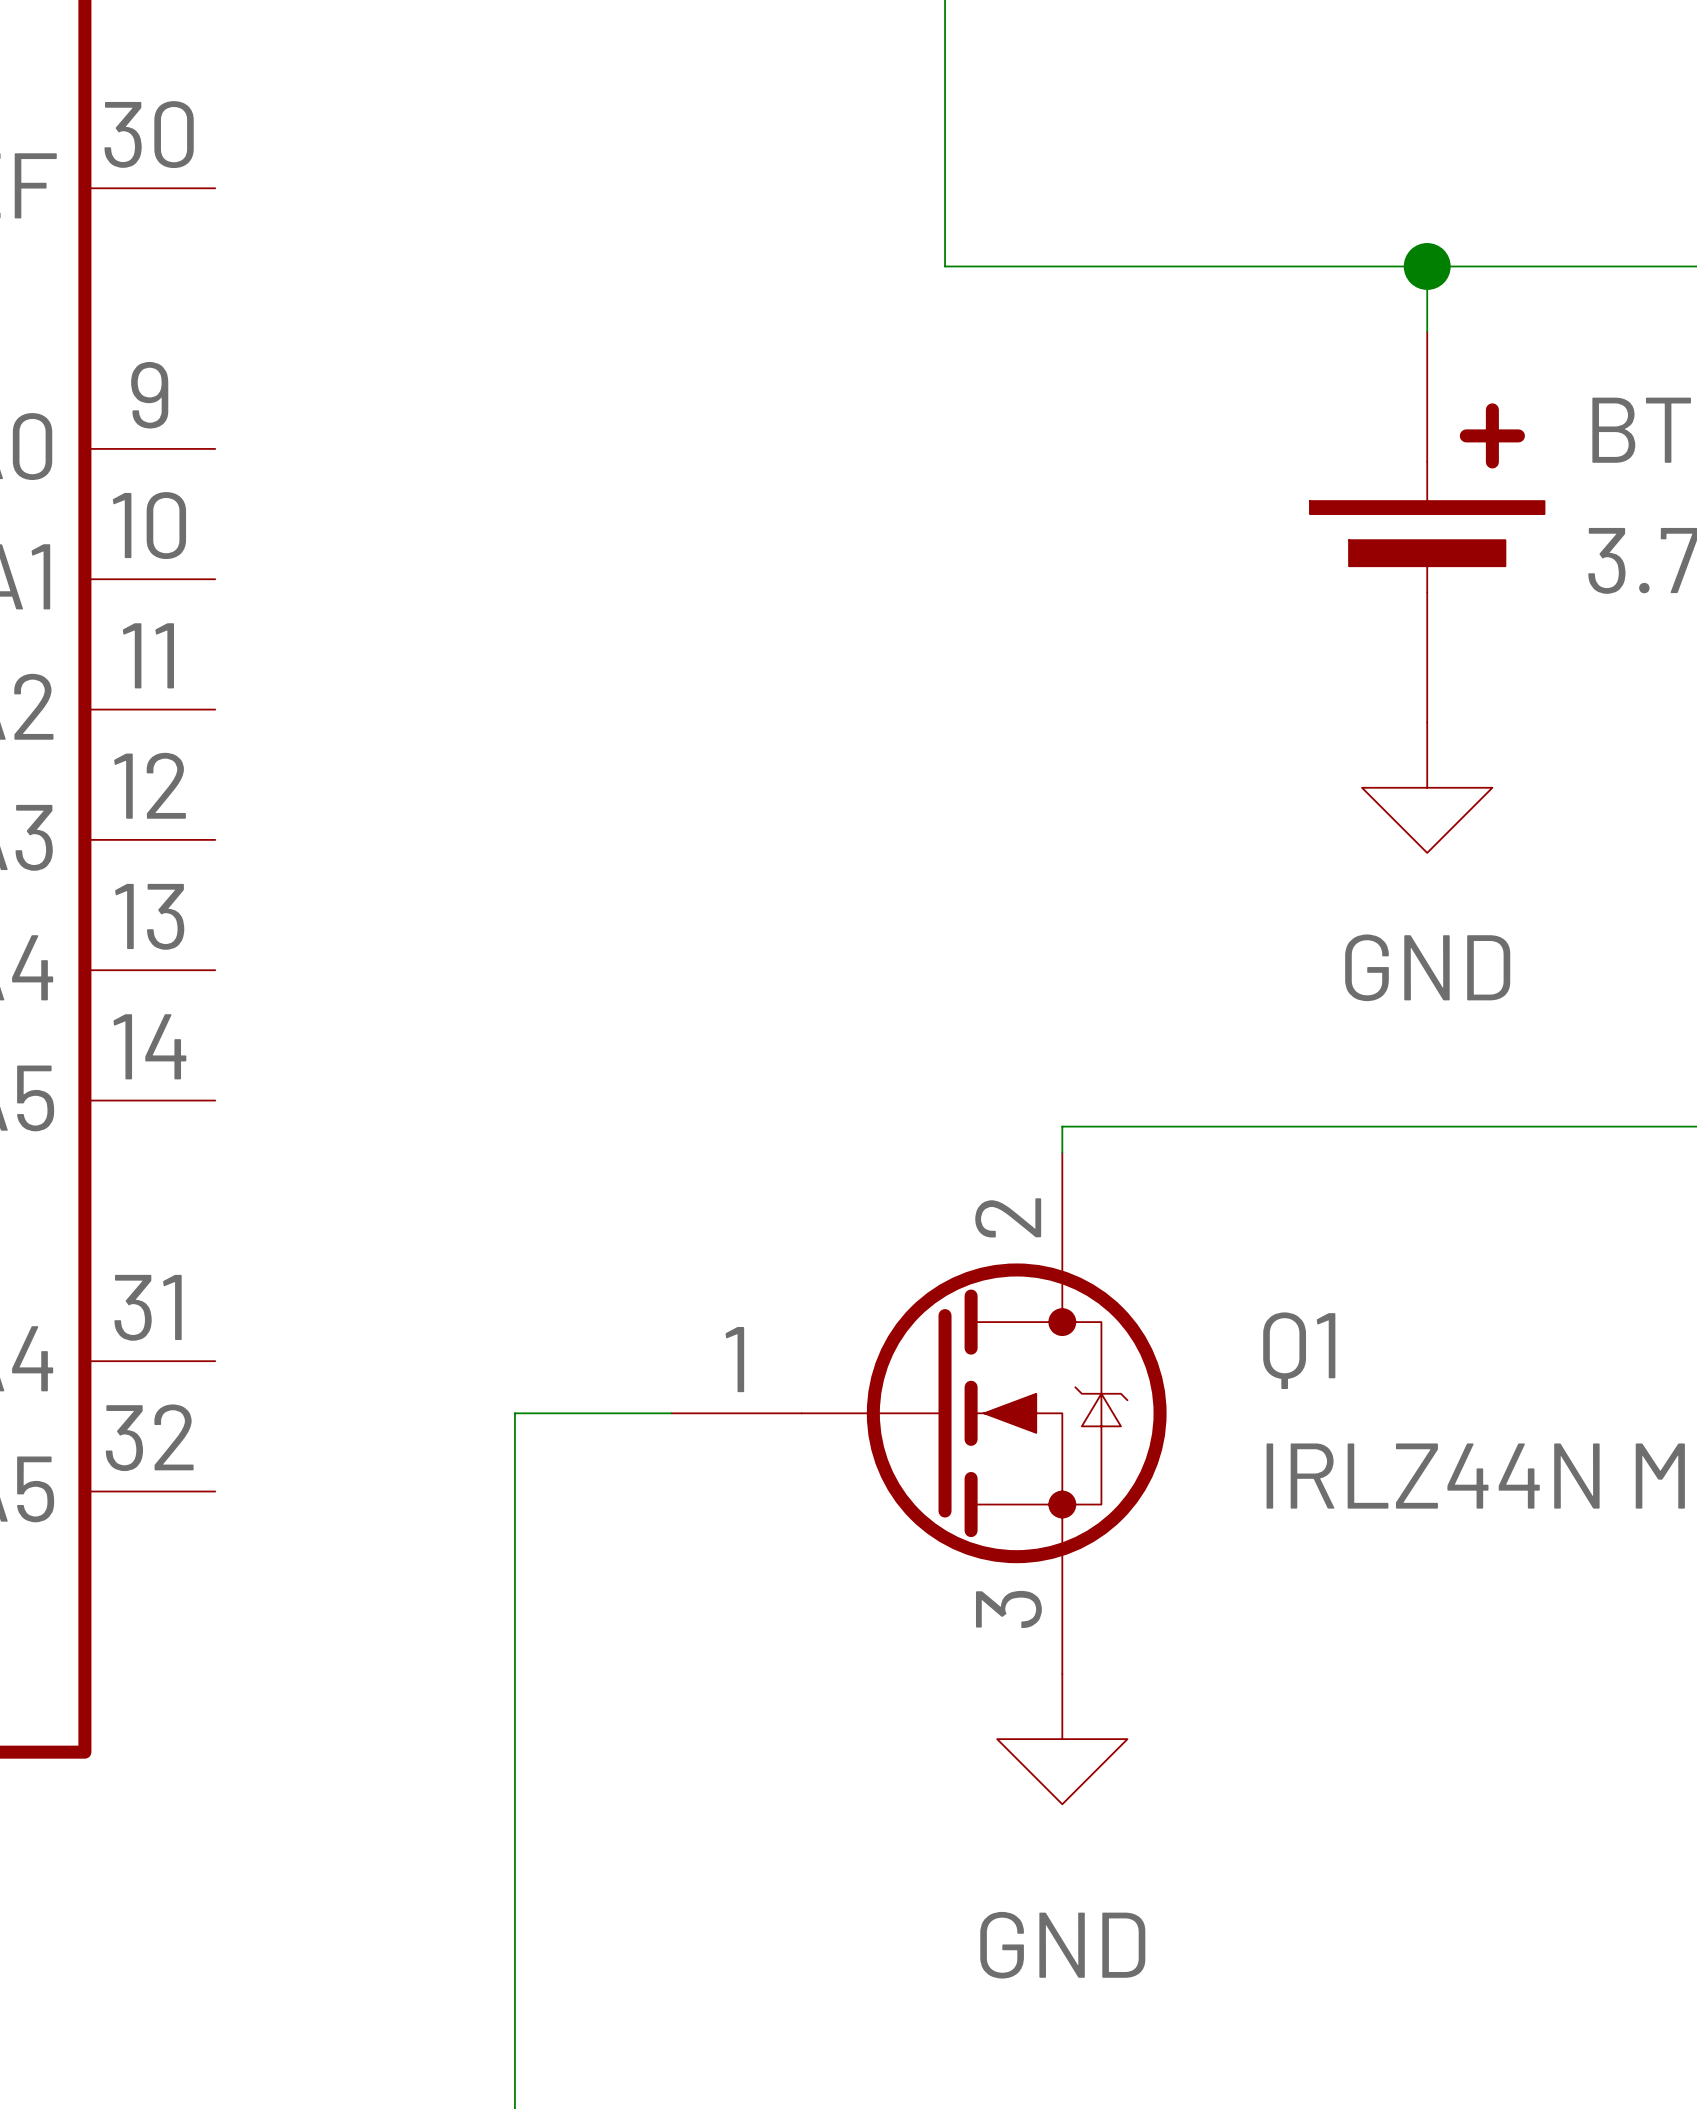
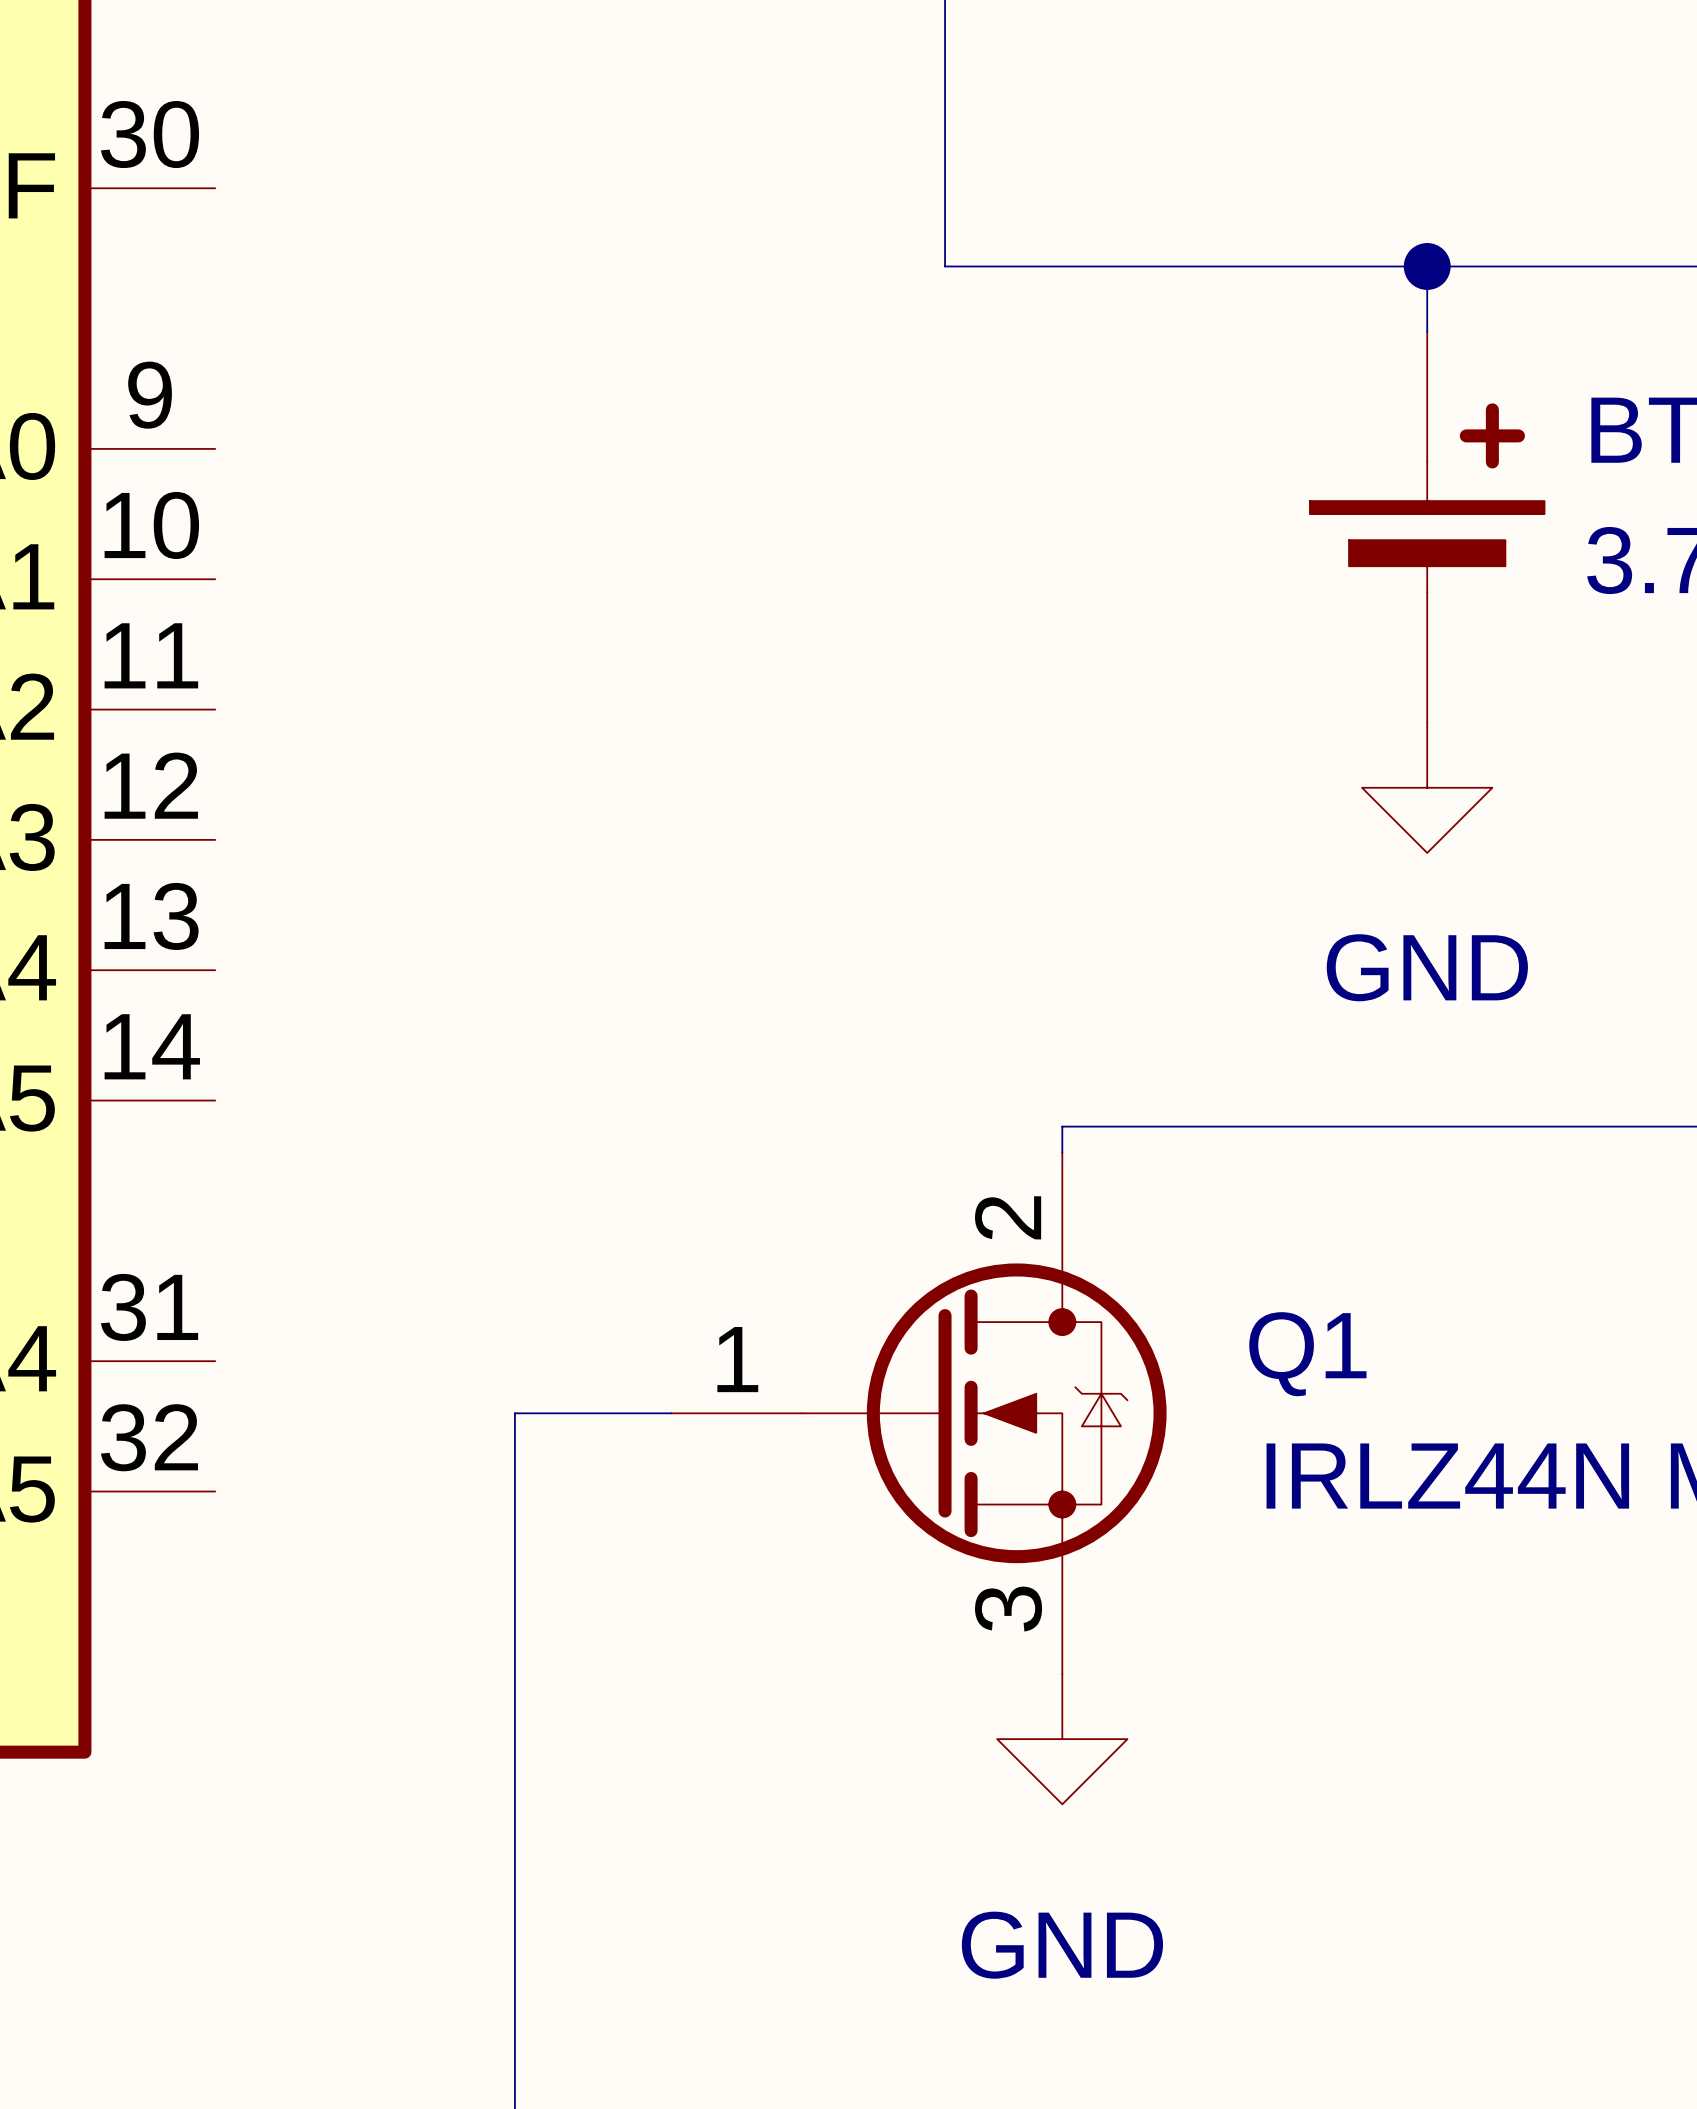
Q1 name position: Q1 (1299, 1350) -> Q1 (1307, 1354)

